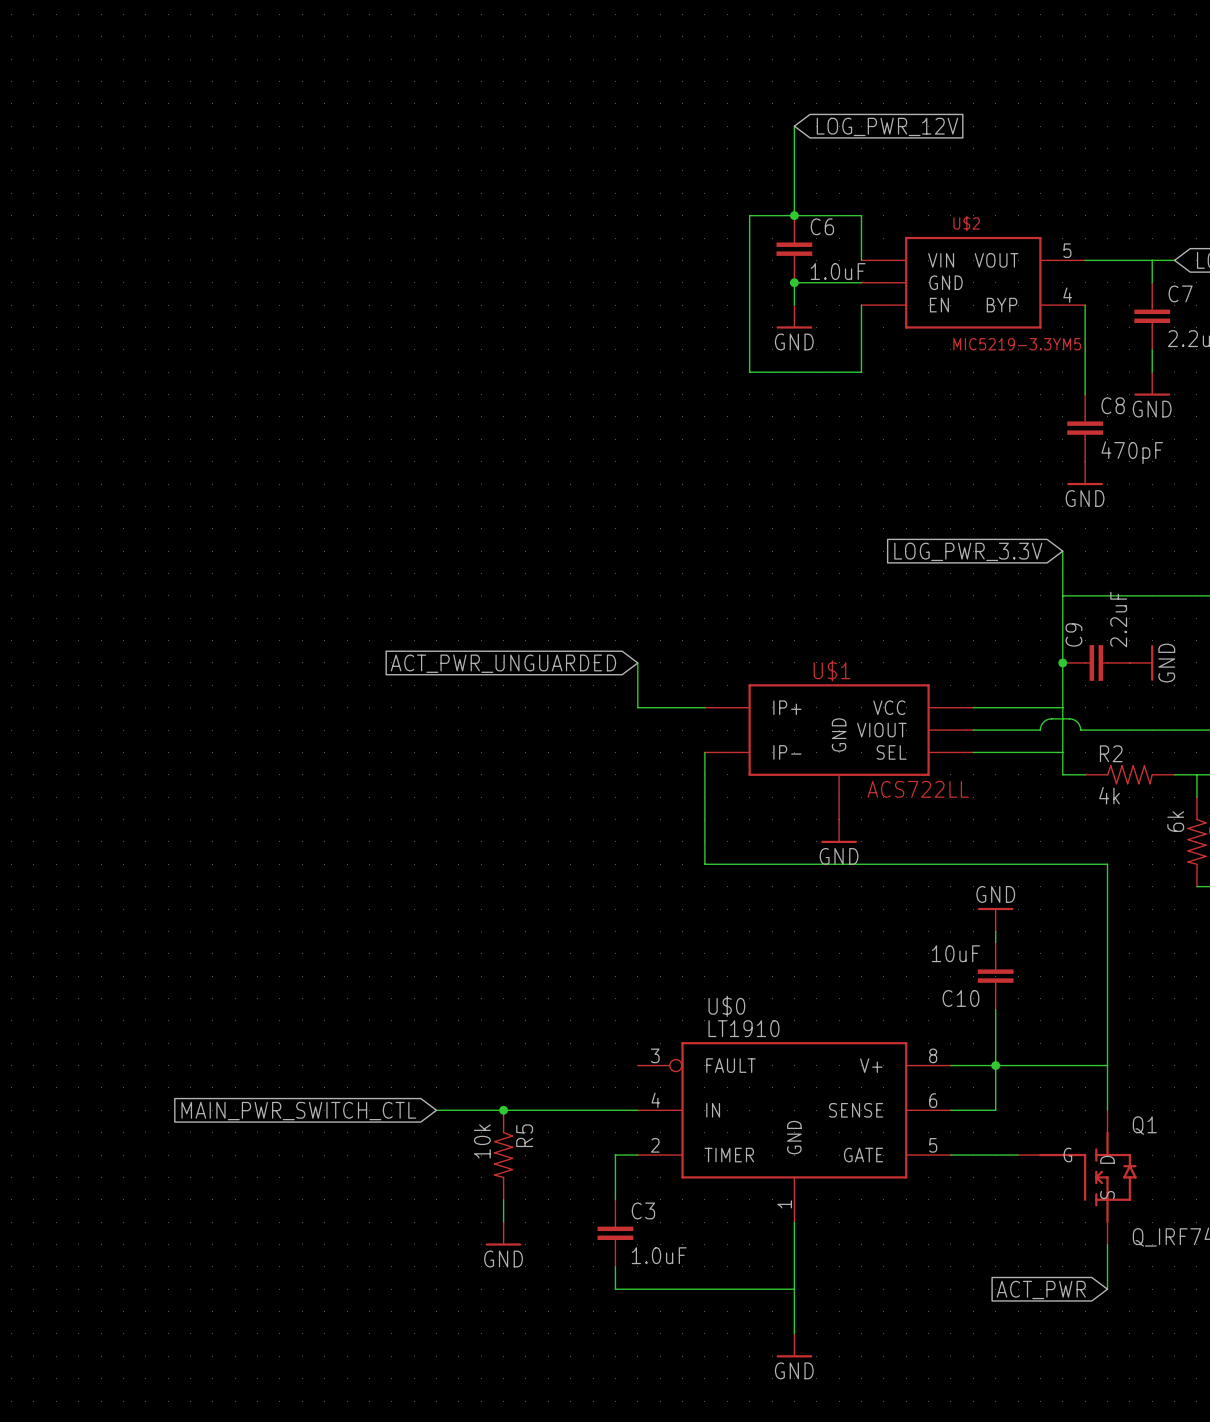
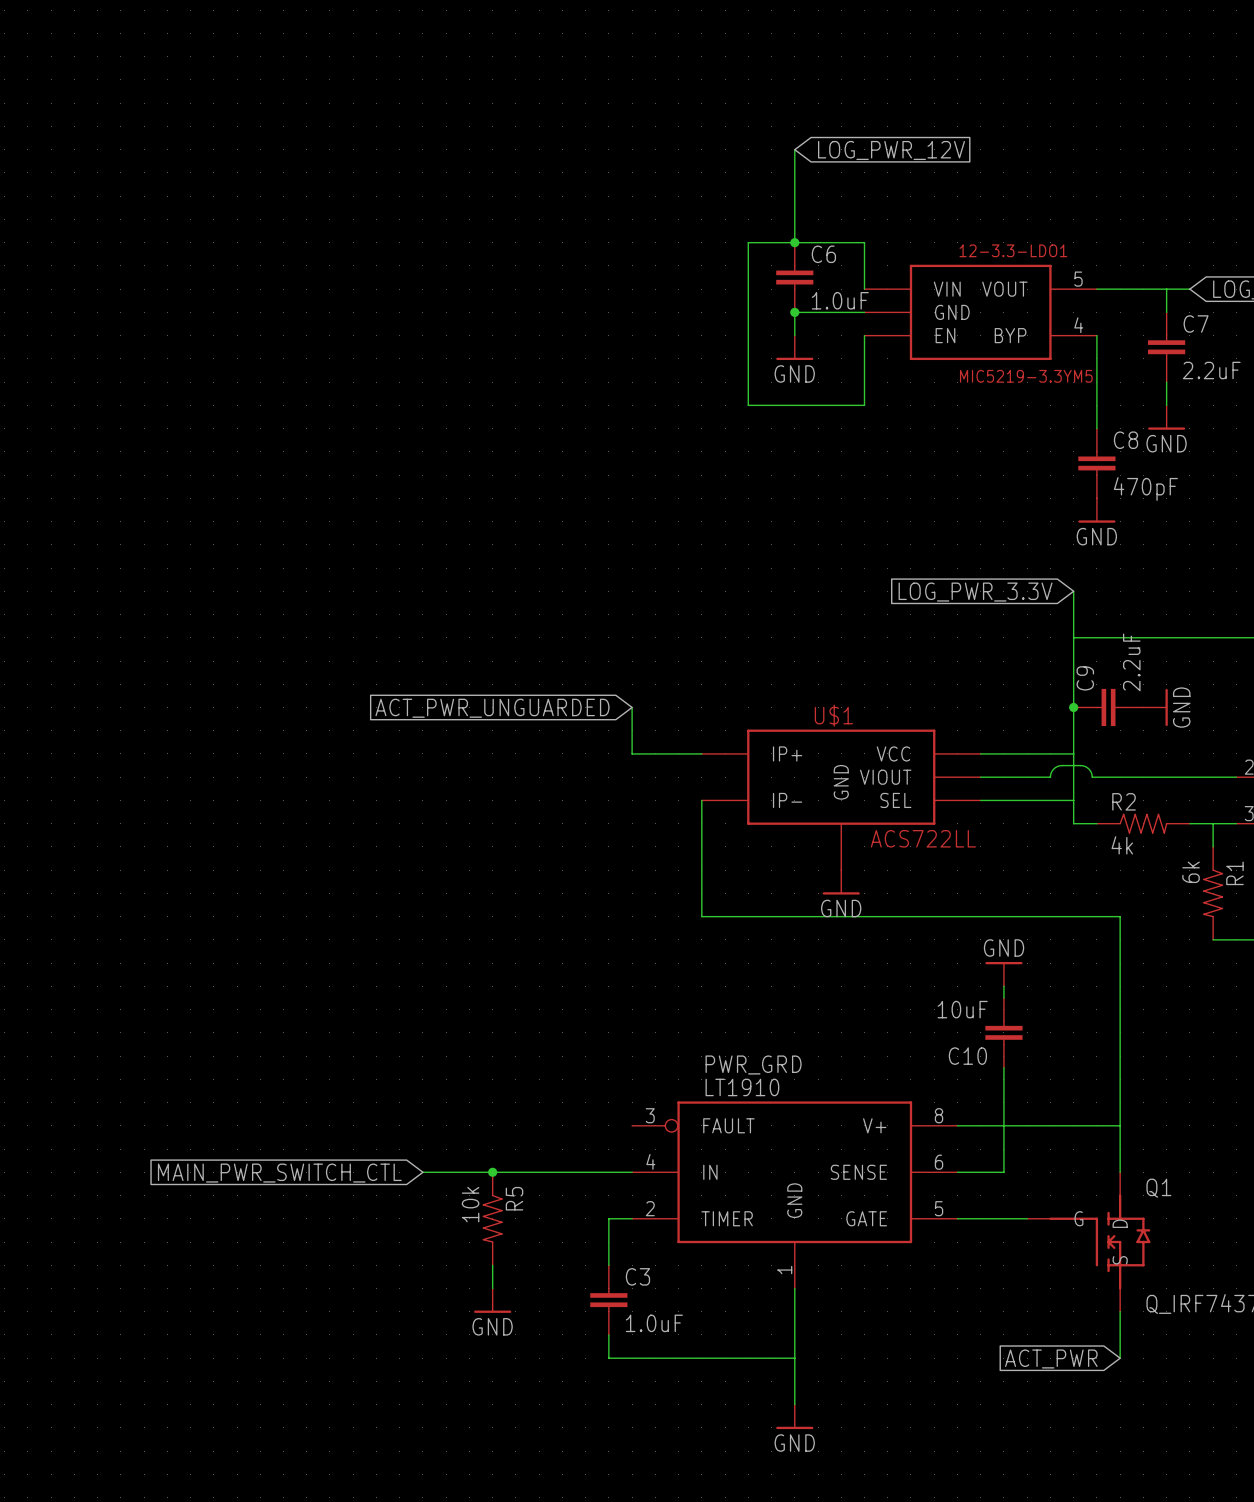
U$2 name: U$2 (966, 223) -> 12-3.3-LDO1 (1013, 250)
U$0 name: U$0 (726, 1006) -> PWR_GRD (753, 1064)
junction: (995, 1065) -> none

